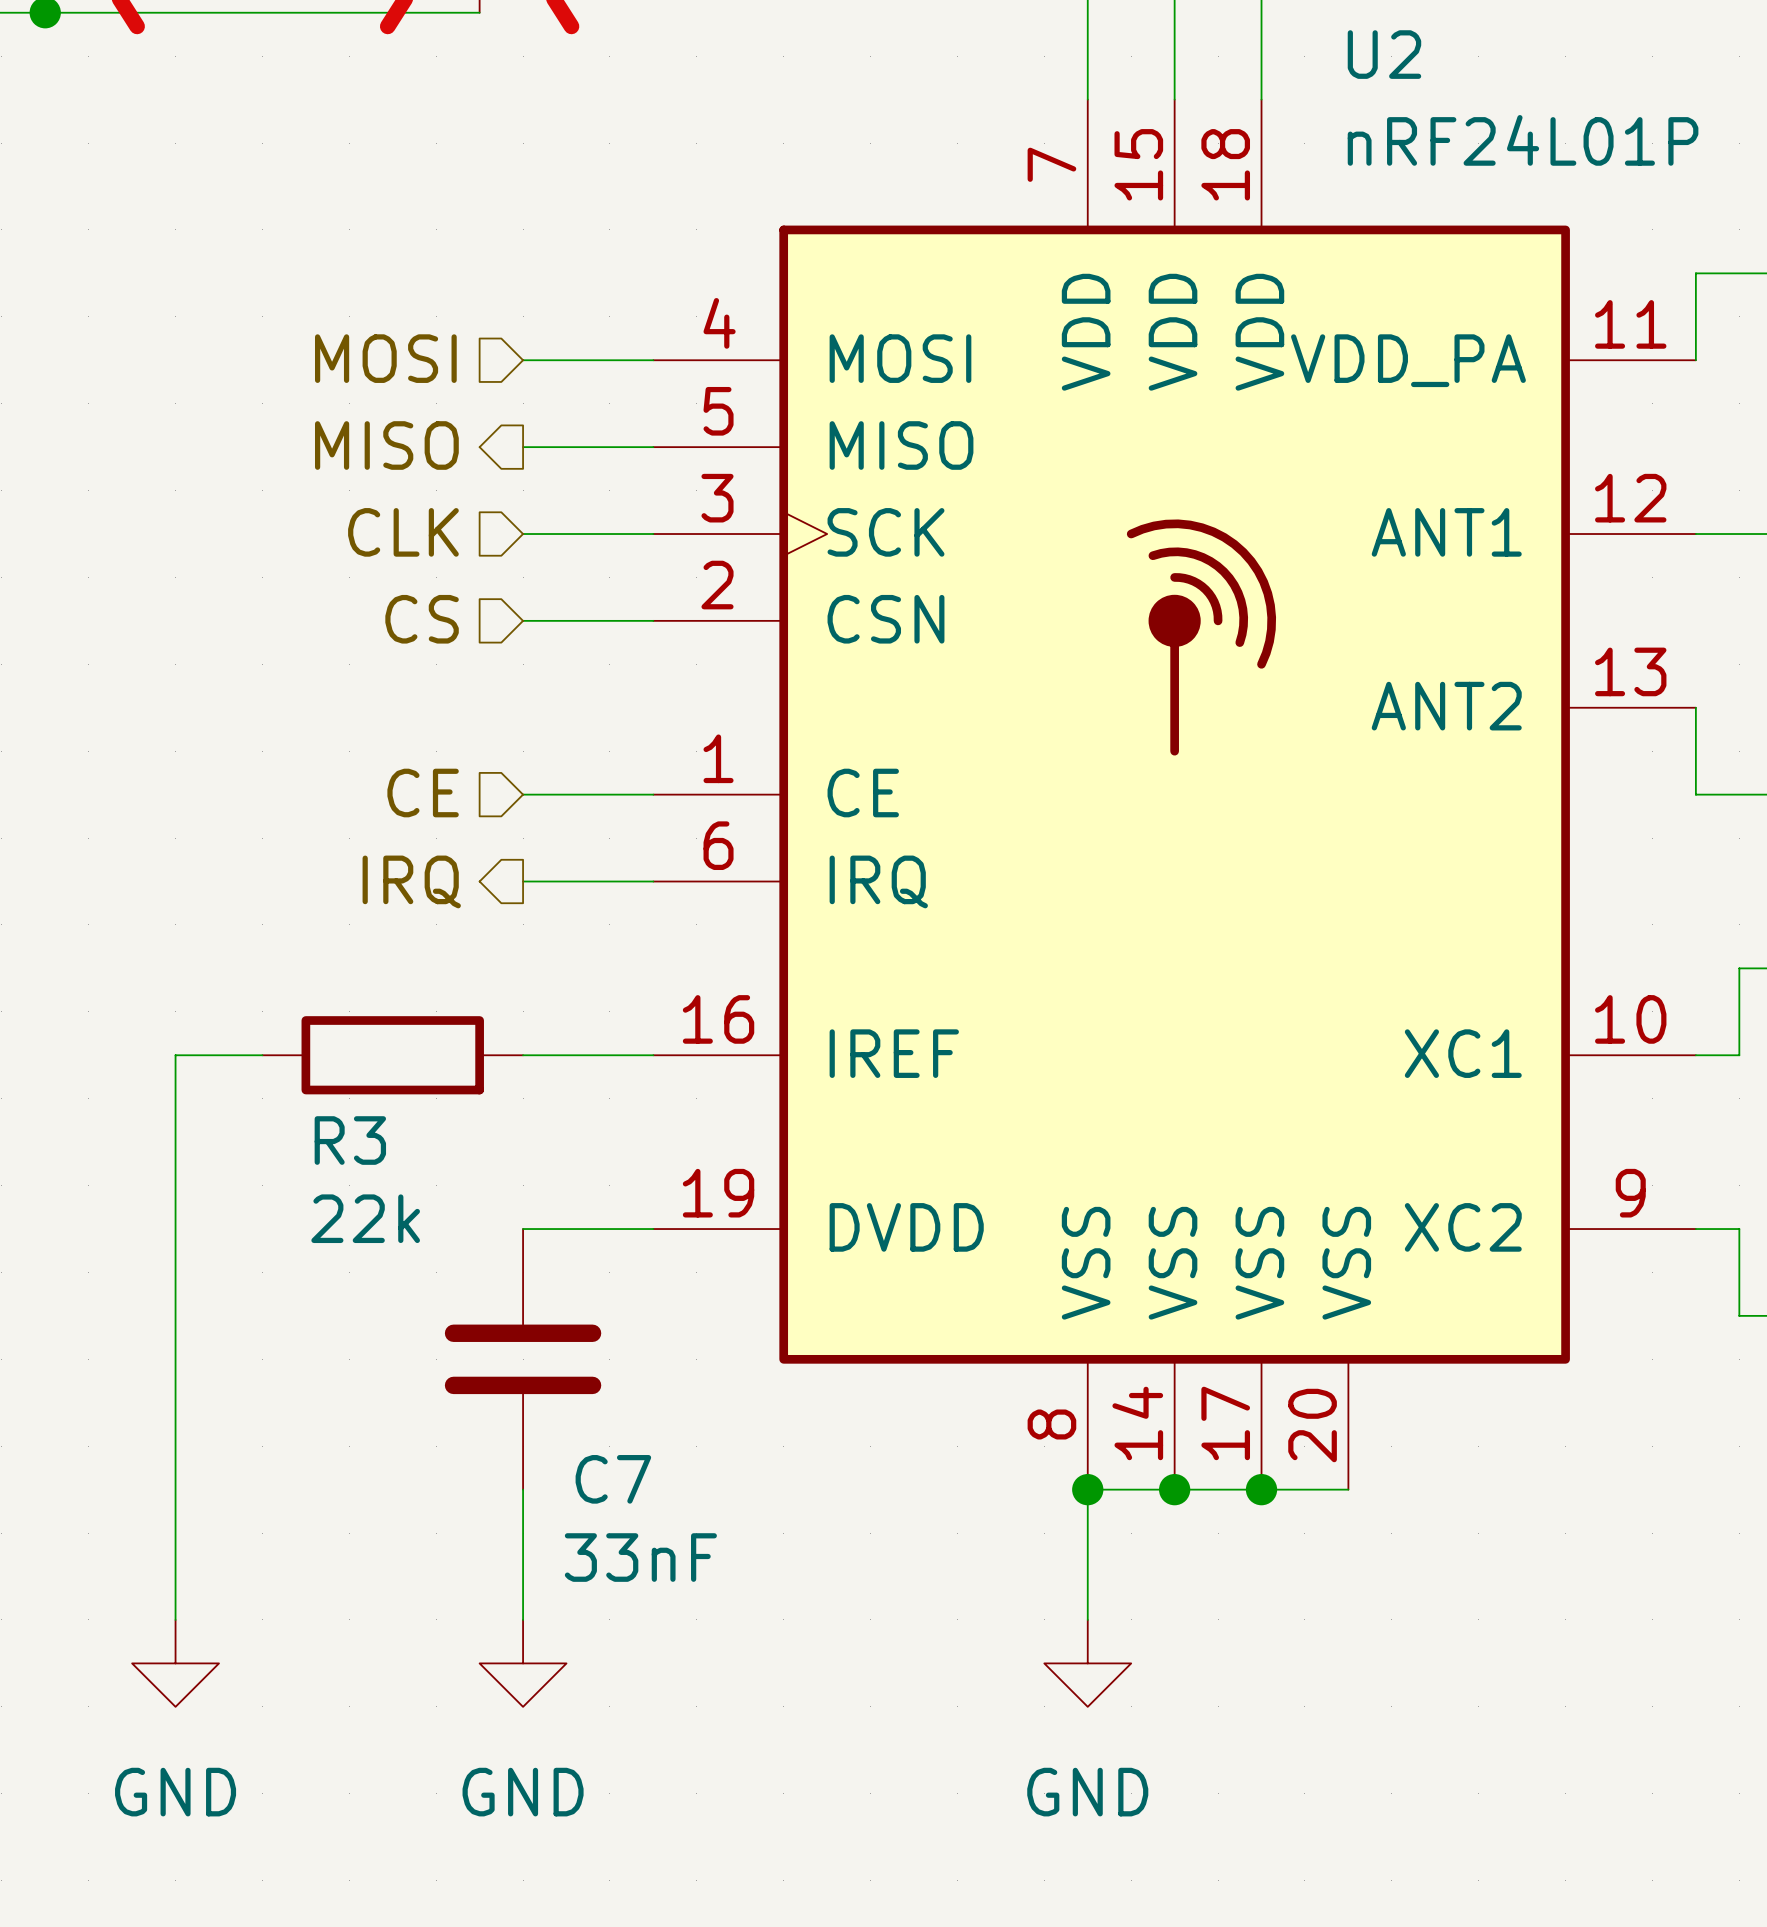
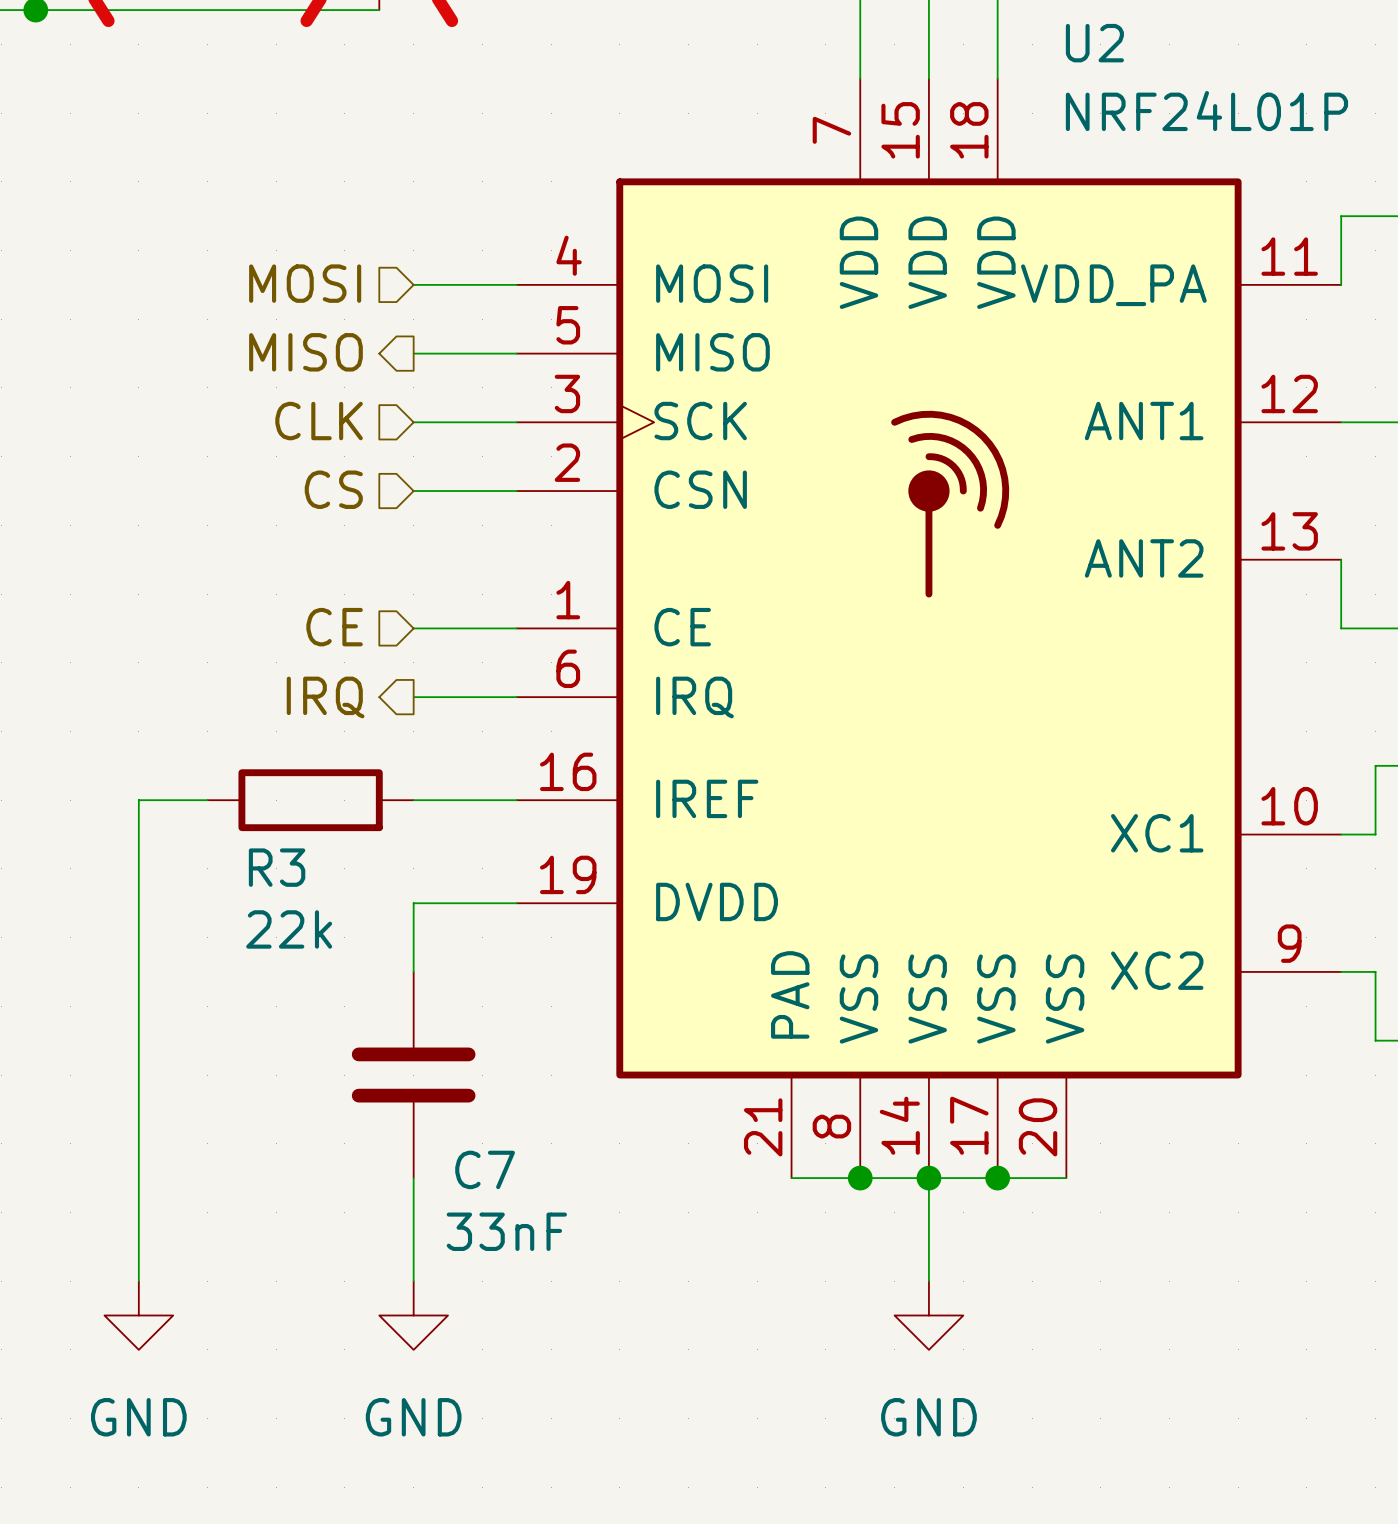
U2 symbol: [653, 99, 1696, 1490] -> [516, 78, 1342, 1179]
U2 value: nRF24L01P (1523, 140) -> NRF24L01P (1206, 111)
wire: (175, 1055) (262, 1055) -> (138, 834) (138, 800) (207, 800)
R3 position: (392, 1055) -> (310, 800)
wire: (523, 1055) (653, 1055) -> (413, 800) (516, 800)
wire: (523, 1229) (653, 1229) -> (413, 971) (413, 903) (516, 903)
wire: (1087, 1489) (1087, 1619) -> (860, 1178) (791, 1178)
wire: none -> (928, 1178) (928, 1281)
power symbol position: GND (1087, 1663) -> GND (928, 1315)

